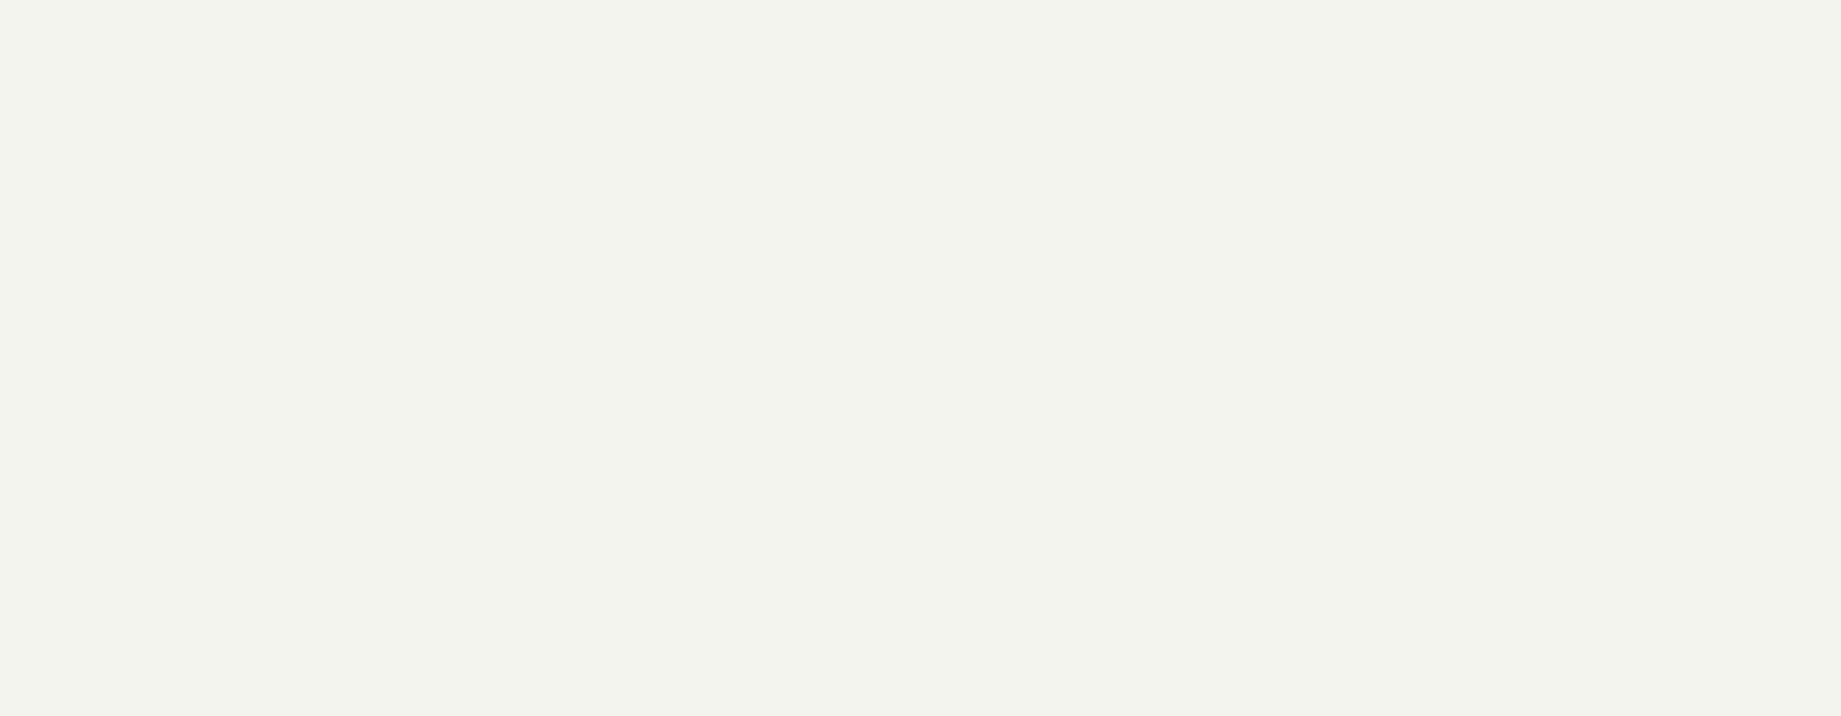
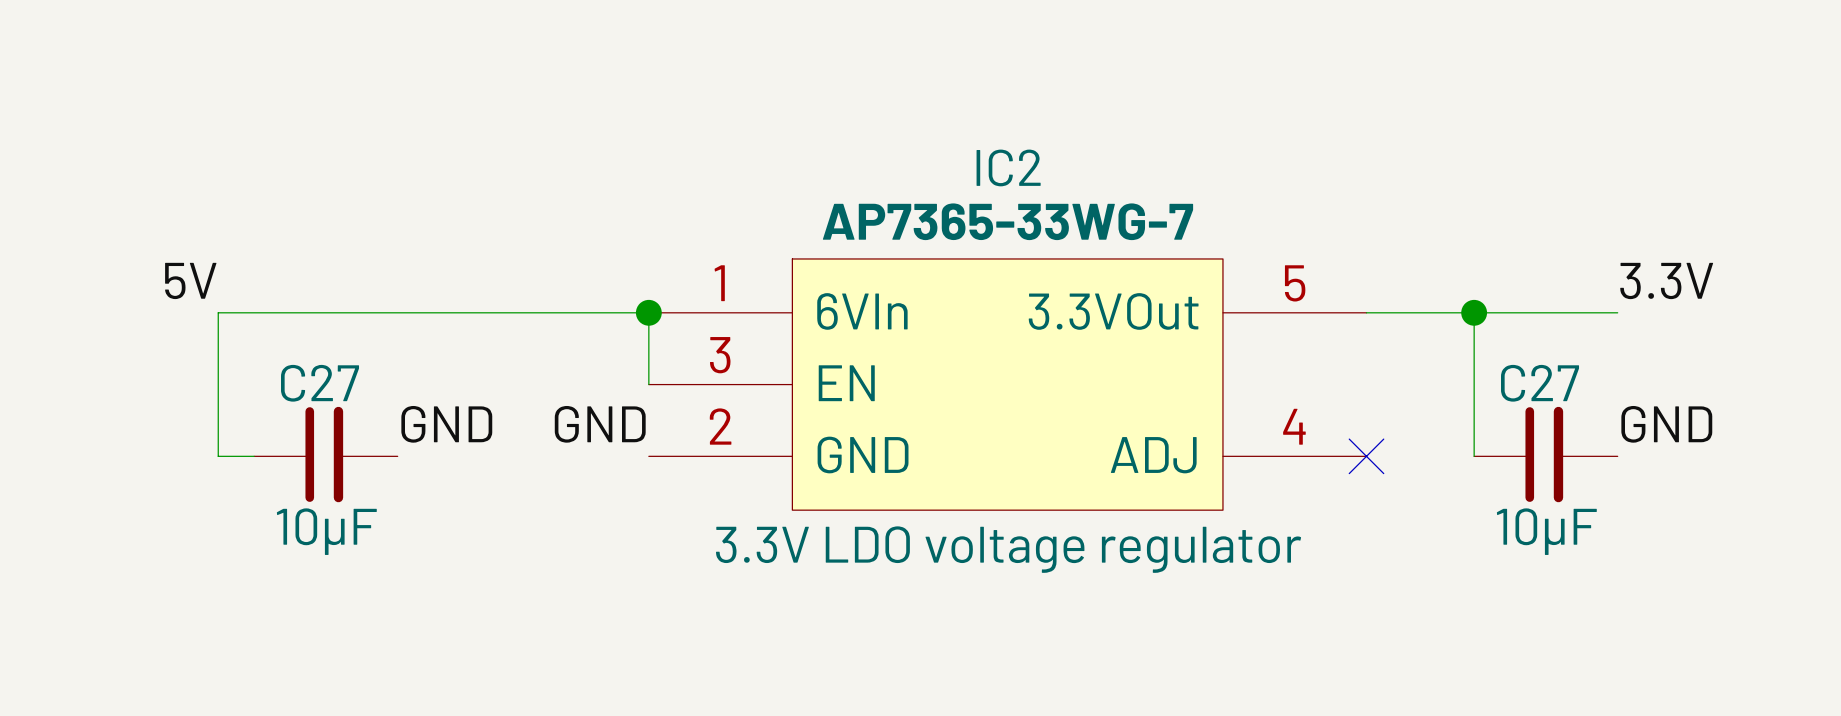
label: none -> 5V (190, 280)
label: none -> 3.3V (1666, 280)
junction: none -> (648, 312)
wire: none -> (1366, 312) (1617, 312)
wire: none -> (1474, 312) (1474, 456)
junction: none -> (1474, 312)
wire: none -> (648, 384) (648, 312) (218, 312) (218, 456) (254, 456)
IC2: none -> AP7365-33WG-7 (1007, 384)
label: none -> GND (446, 424)
label: none -> GND (600, 424)
label: none -> GND (1666, 424)
C27: none -> 10μF (325, 454)
C27: none -> 10μF (1545, 454)
no-connect mark: none -> (1366, 456)

